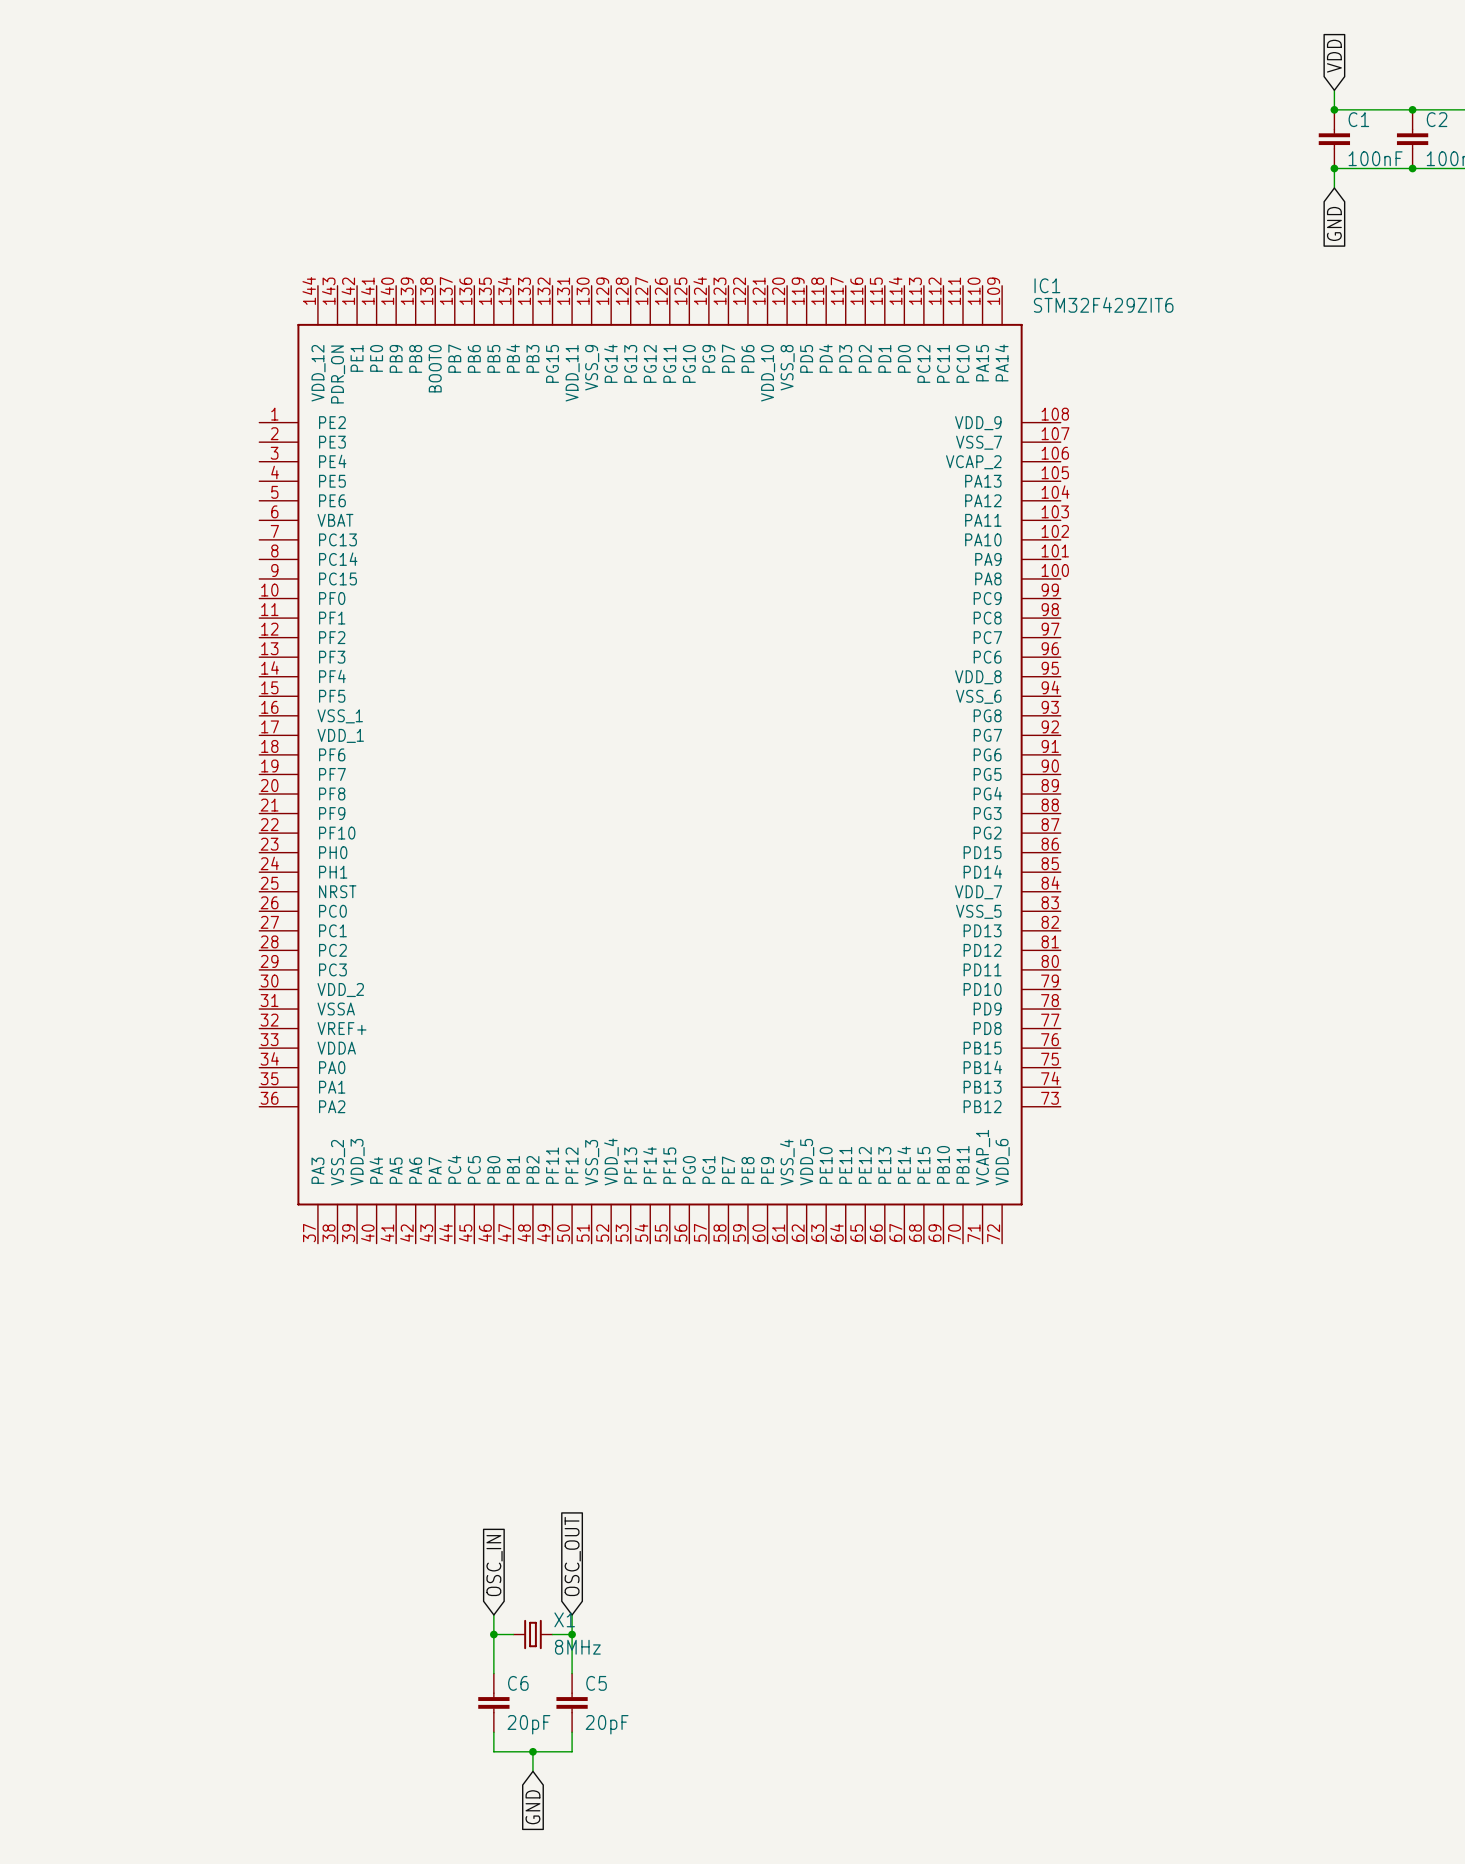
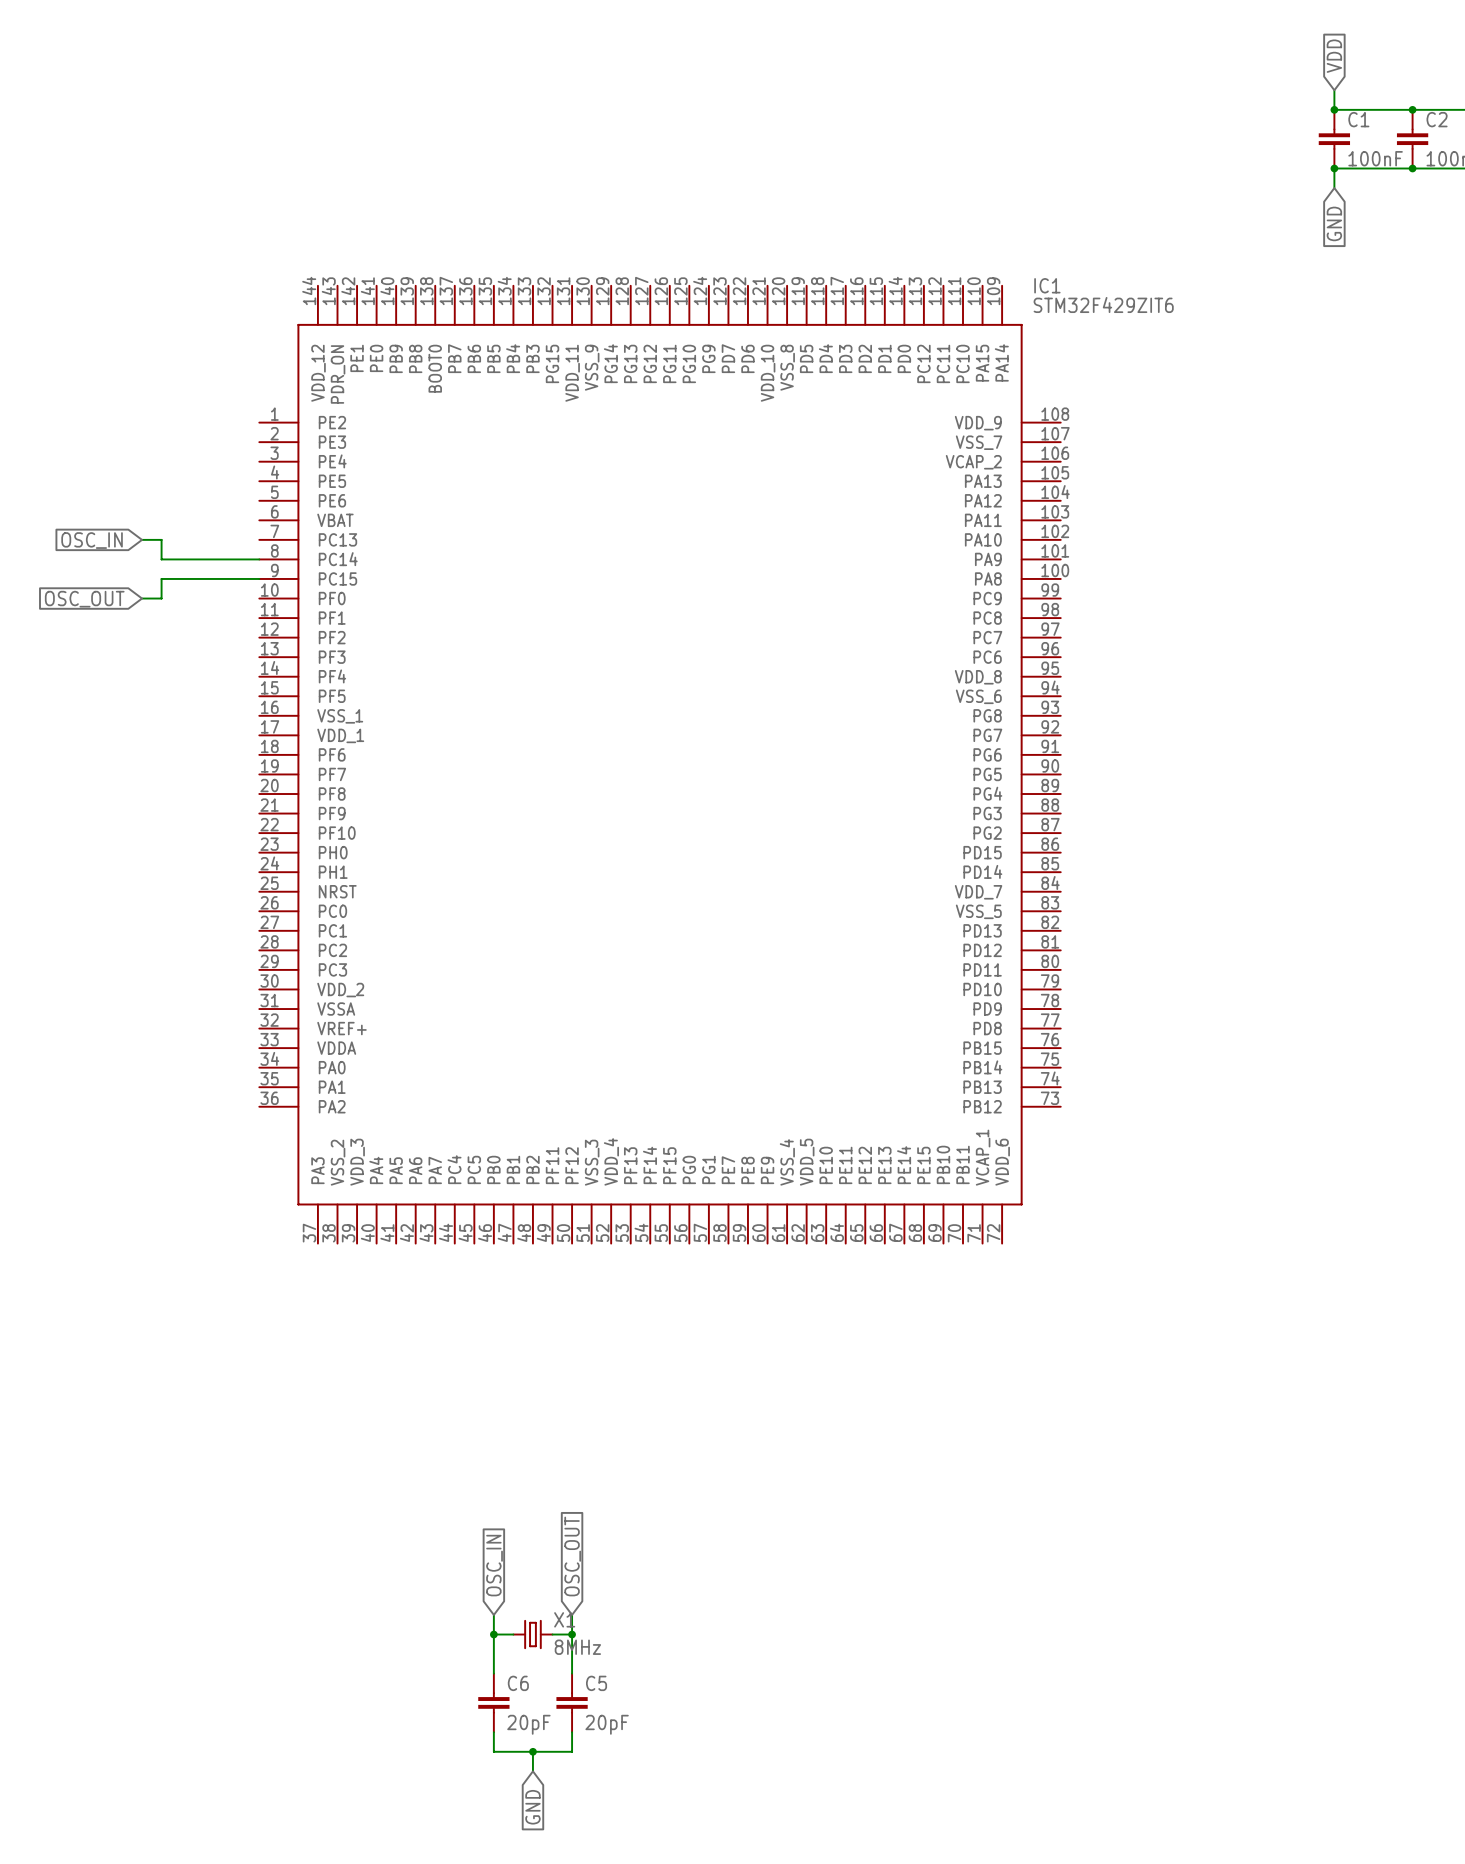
wire: none -> (142, 539) (161, 539) (161, 559) (259, 559)
global label: none -> OSC_IN (92, 540)
wire: none -> (259, 578) (161, 578) (161, 598) (142, 598)
global label: none -> OSC_OUT (84, 599)

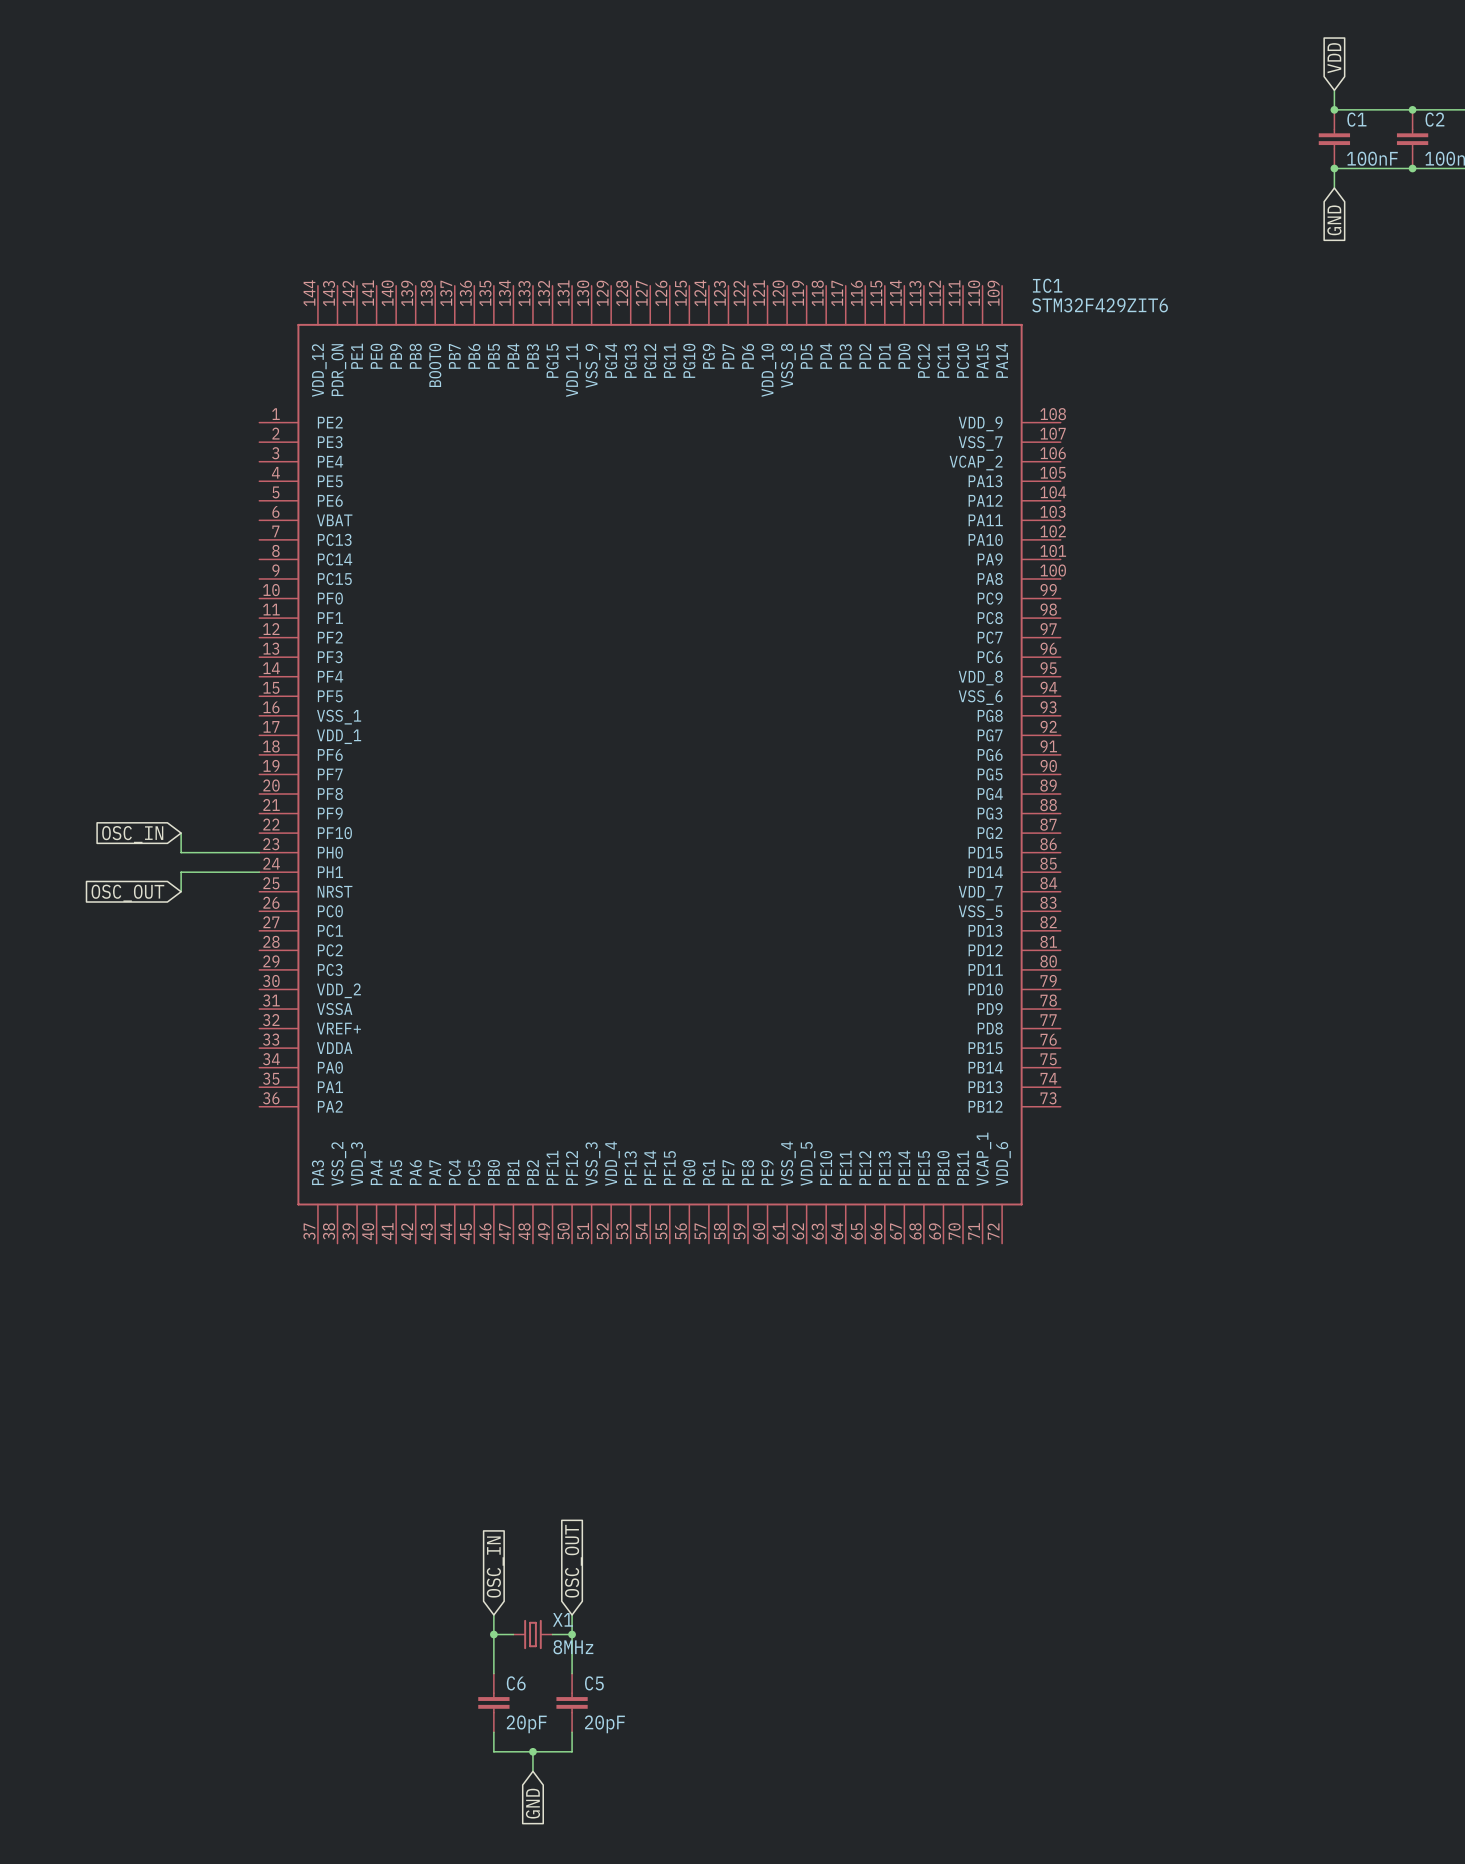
wire: (142, 539) (161, 539) (161, 559) (259, 559) -> none
global label: OSC_IN (92, 540) -> none
wire: (259, 578) (161, 578) (161, 598) (142, 598) -> none
global label: OSC_OUT (84, 599) -> none
global label: none -> OSC_IN (132, 834)
wire: none -> (181, 833) (181, 852) (259, 852)
wire: none -> (259, 872) (181, 872) (181, 891)
global label: none -> OSC_OUT (127, 893)

